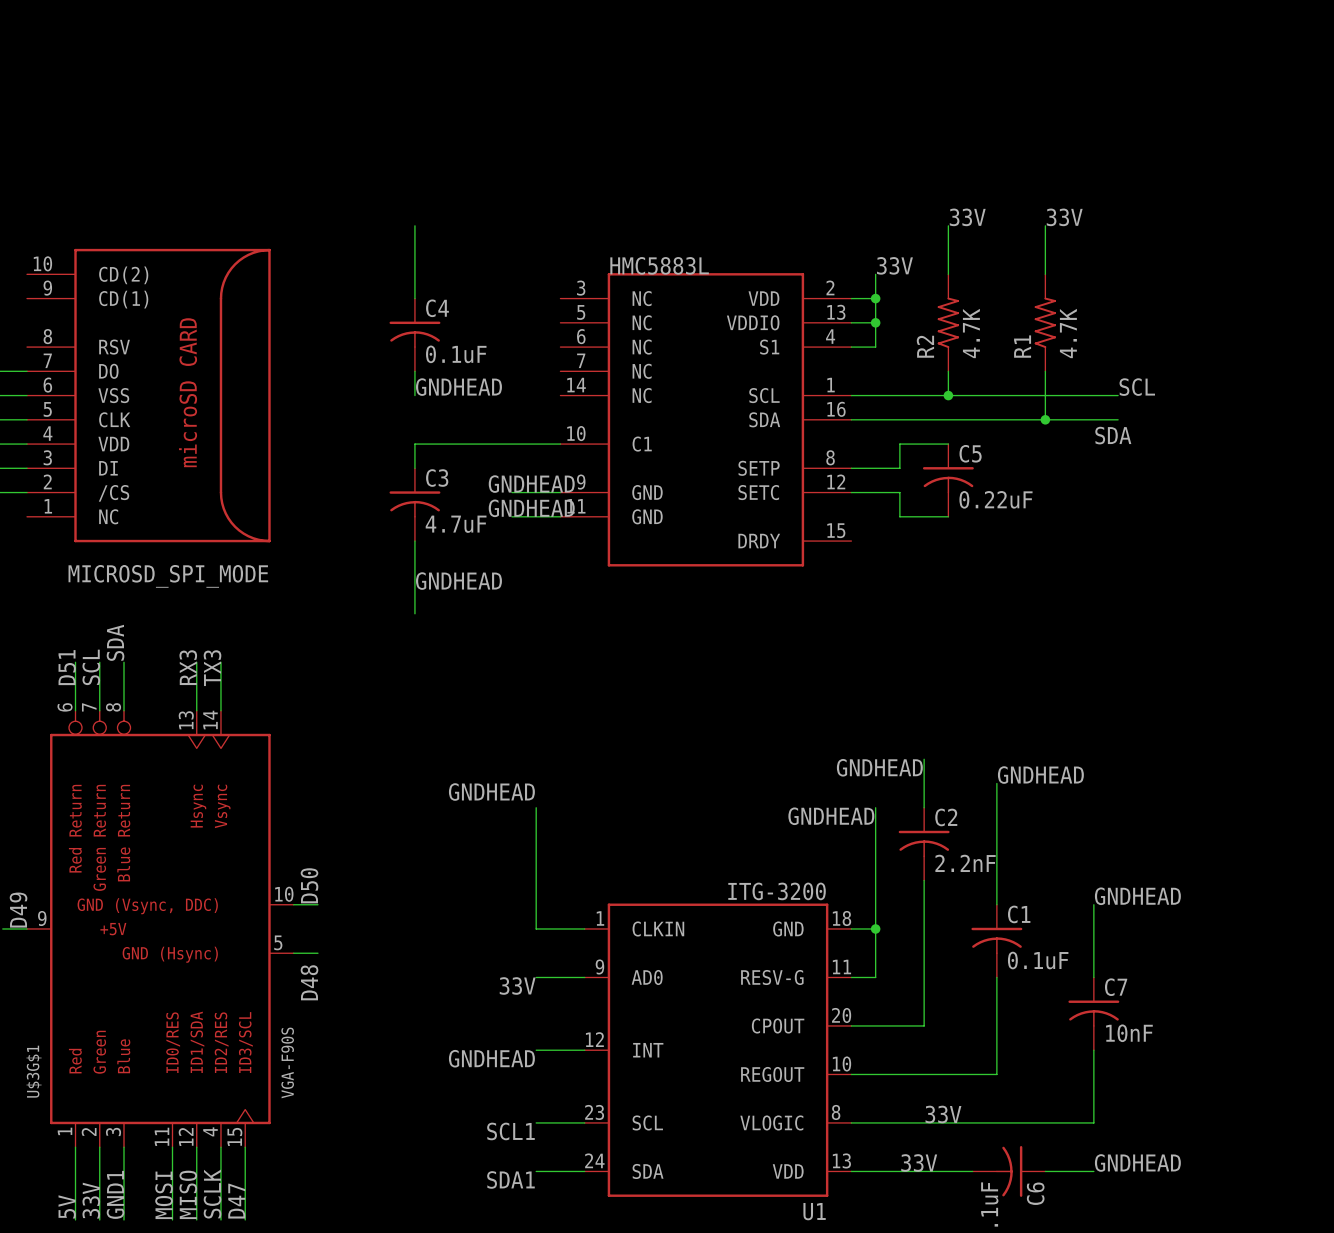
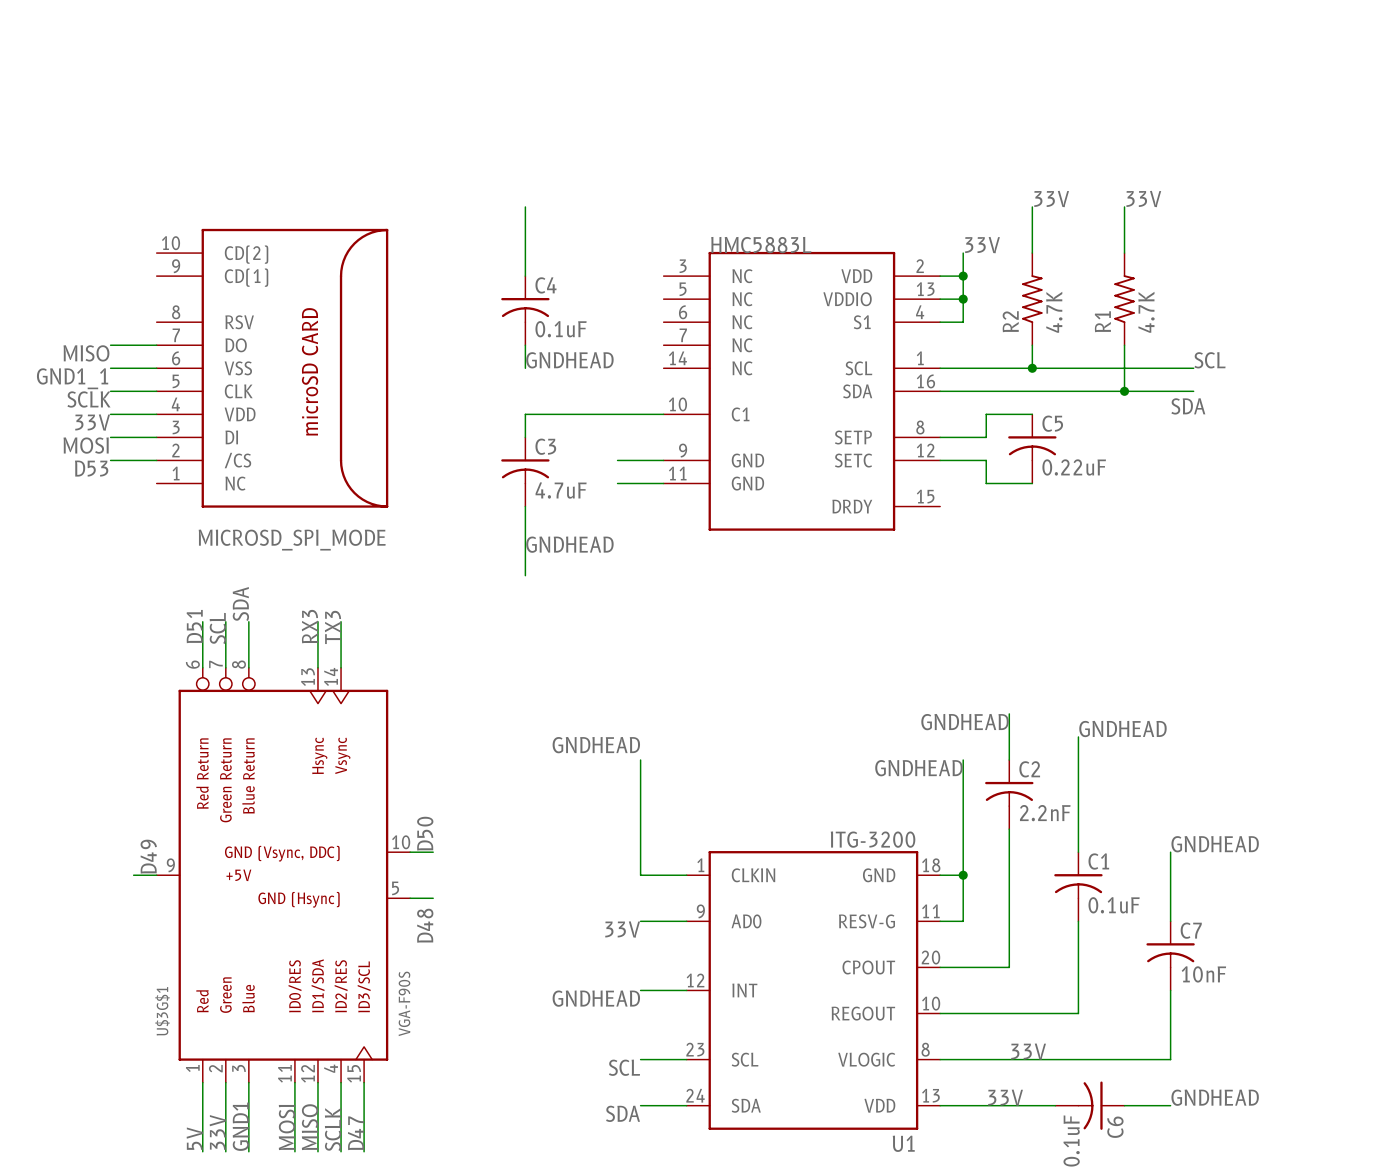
label: GNDHEAD (531, 484) -> none
label: GNDHEAD (531, 508) -> none
label: SCL1 (510, 1131) -> SCL (624, 1067)
label: SDA1 (510, 1179) -> SDA (623, 1113)

